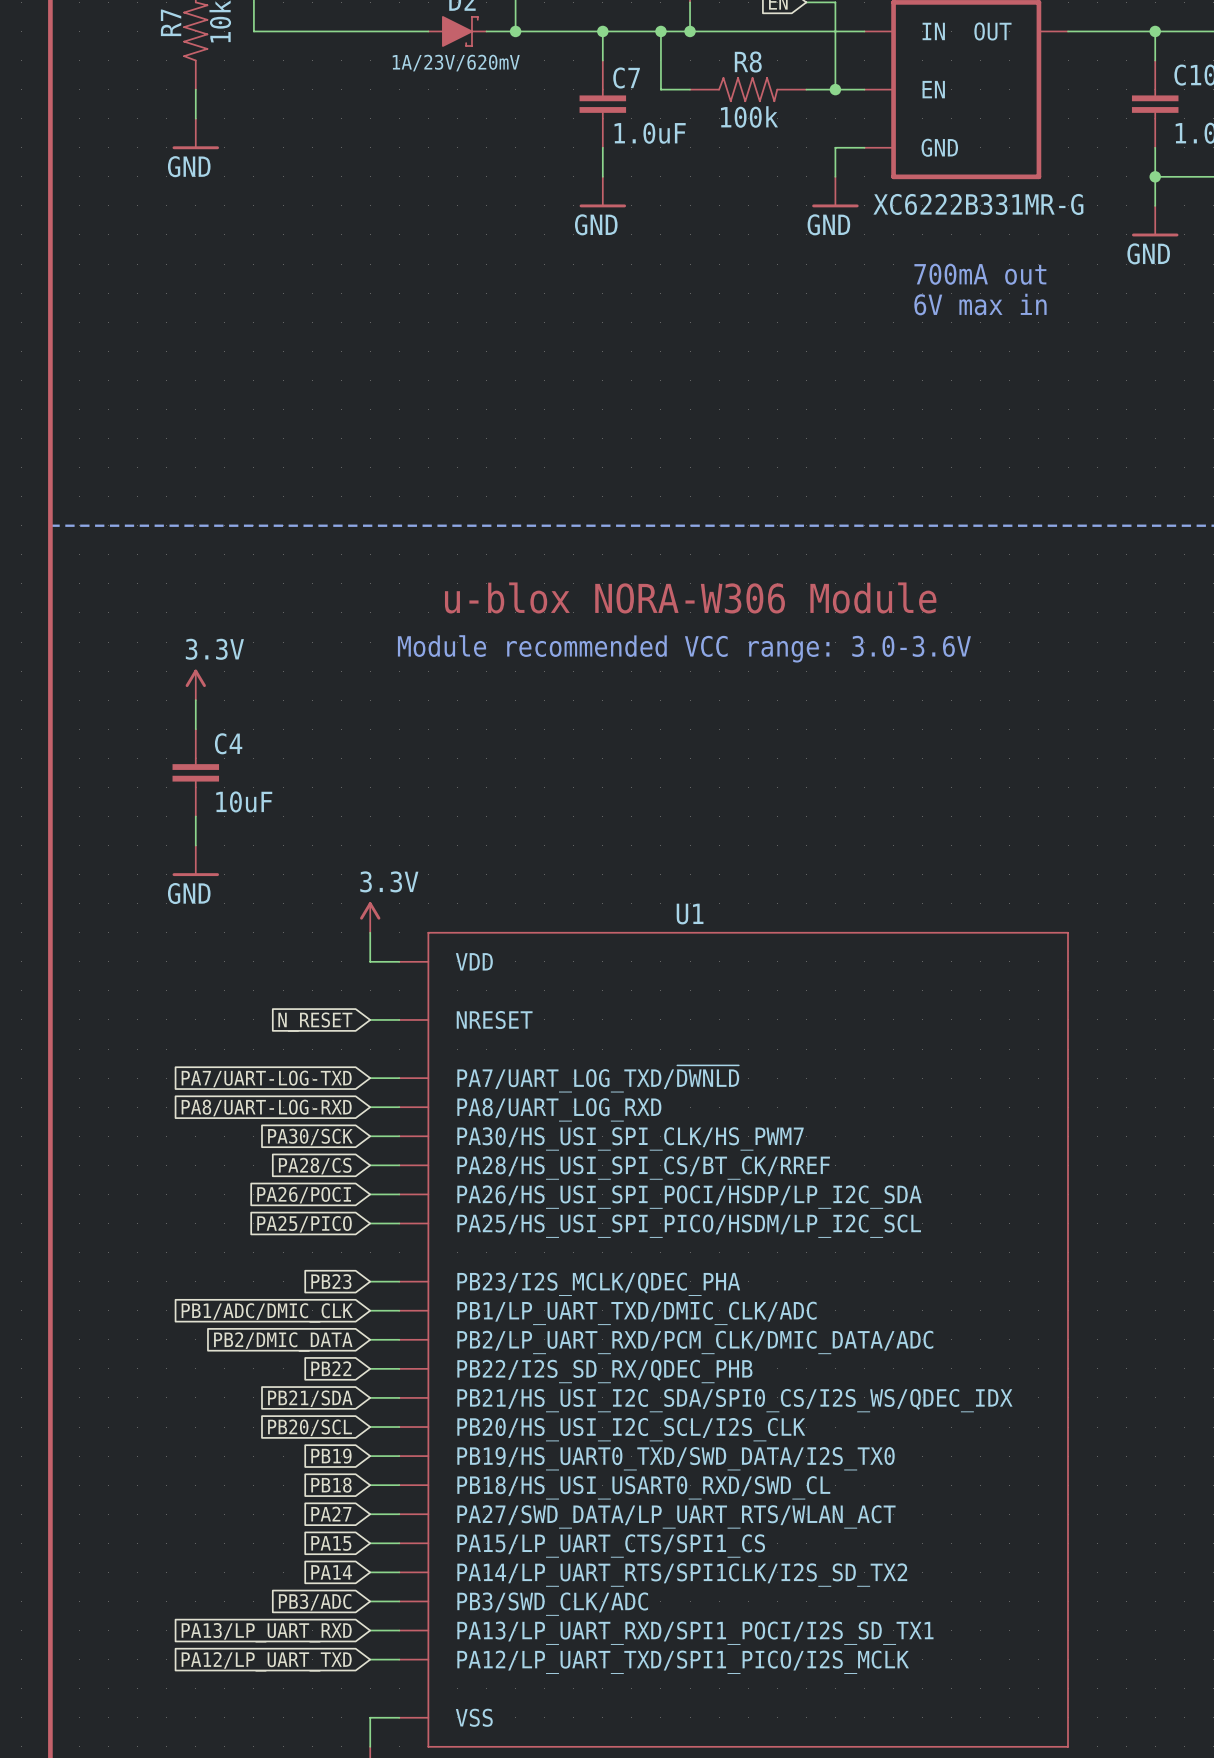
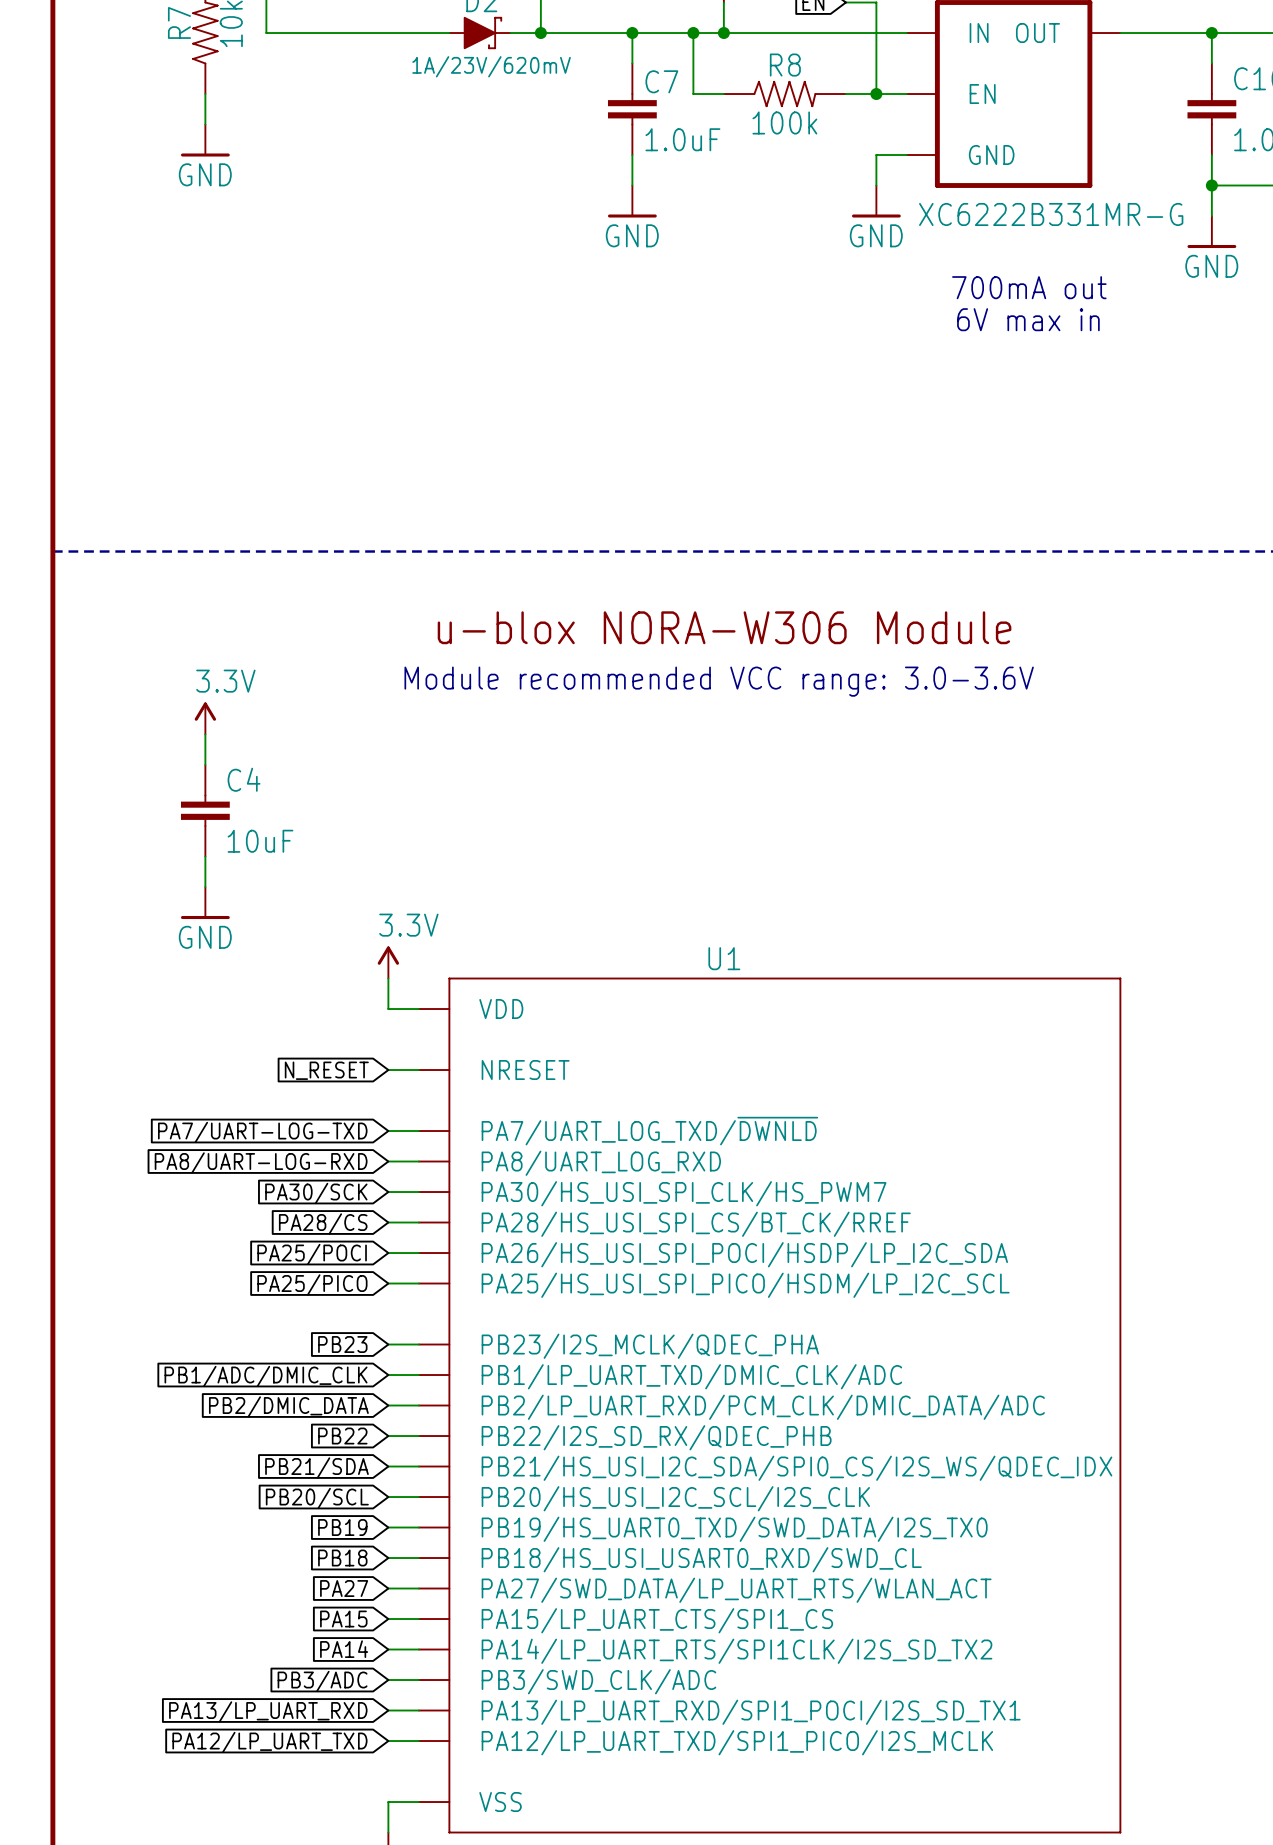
global label: PA26/POCI (304, 1195) -> PA25/POCI (312, 1254)

